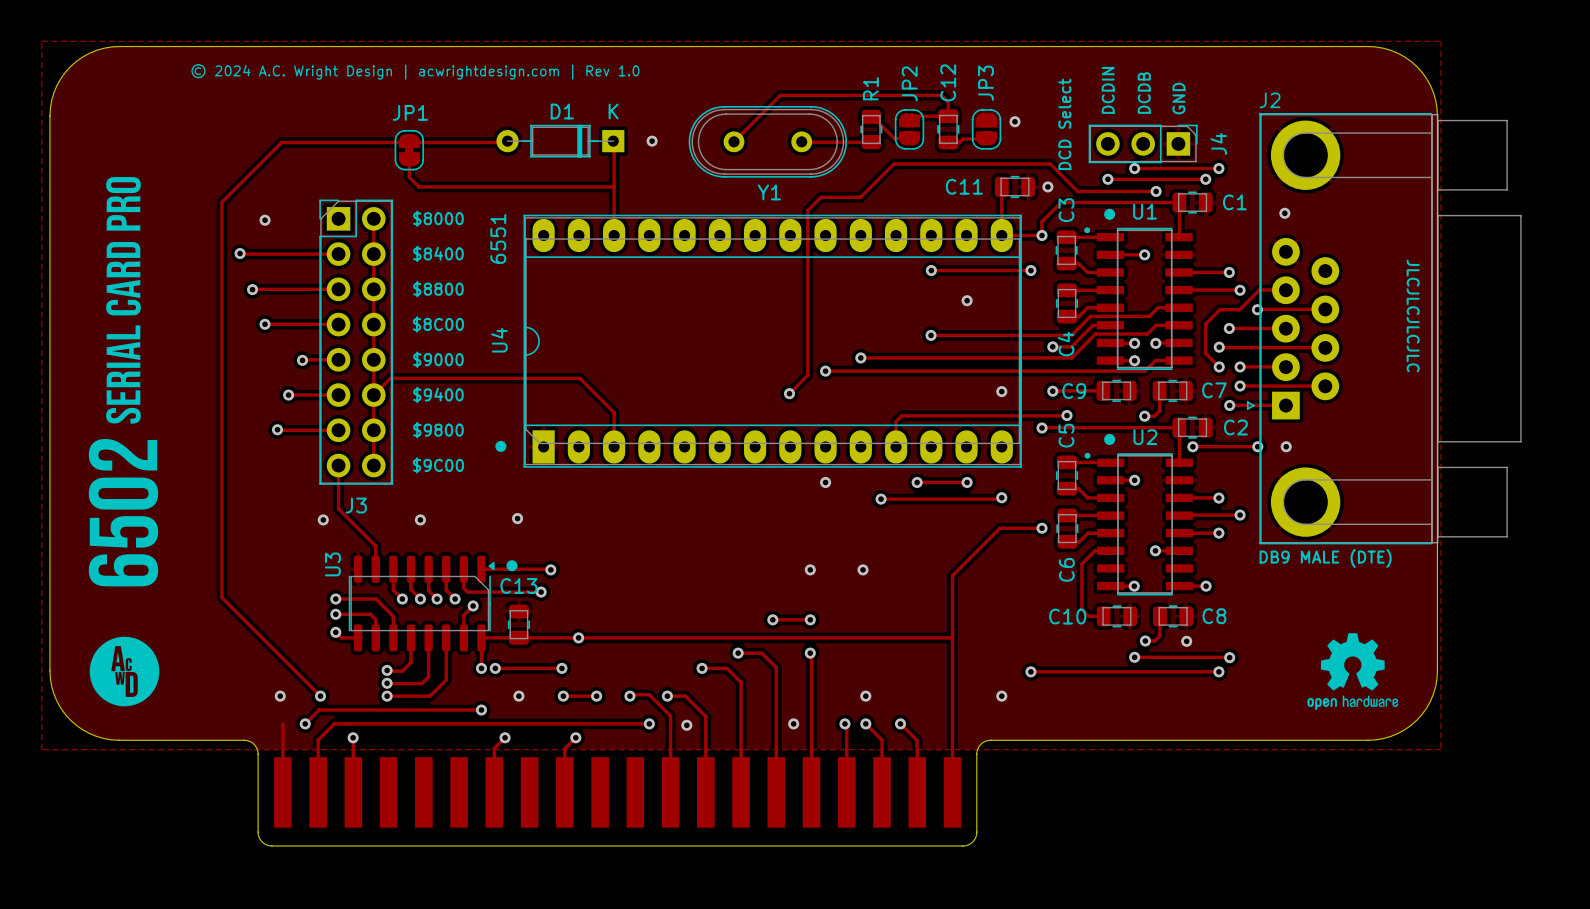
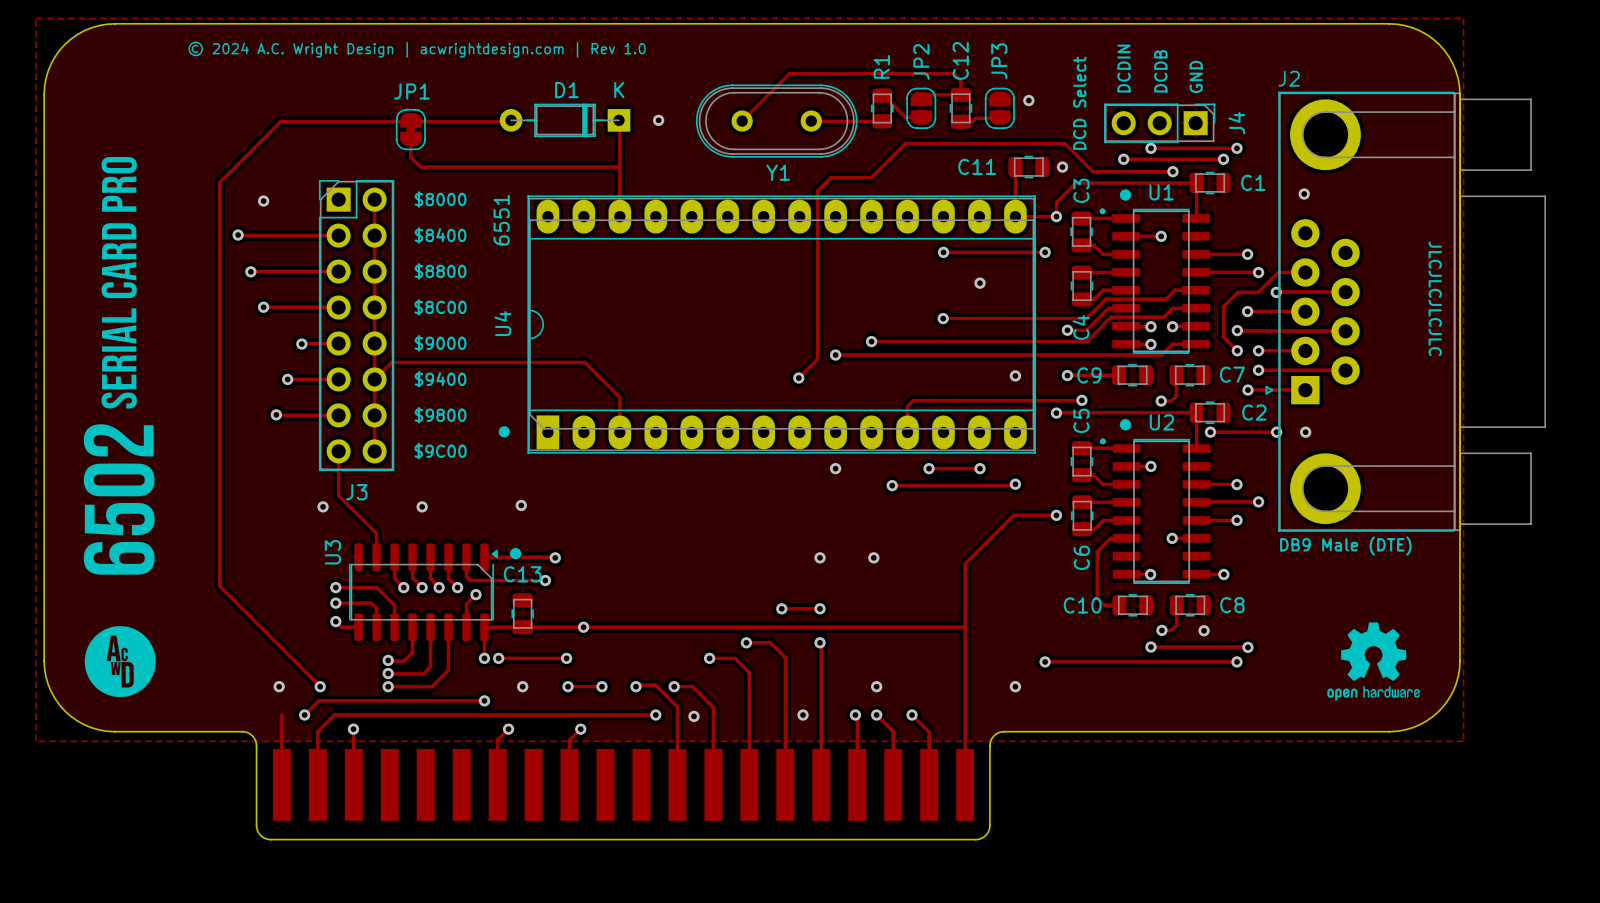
J2 value: DB9 MALE (DTE) (1325, 558) -> DB9 Male (DTE) (1345, 546)

